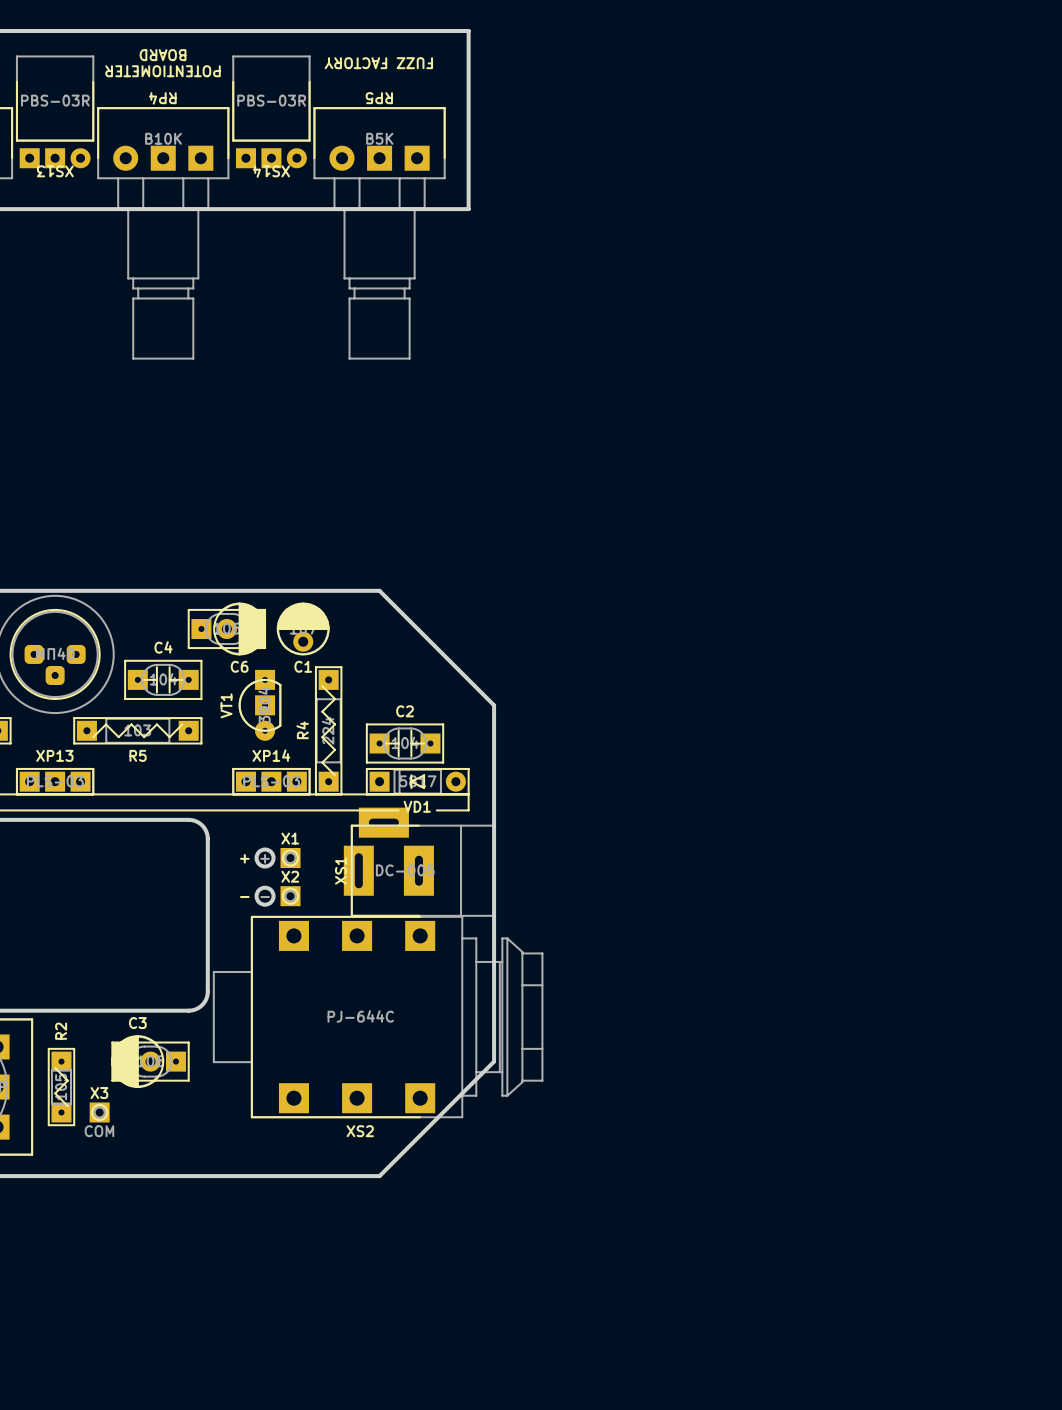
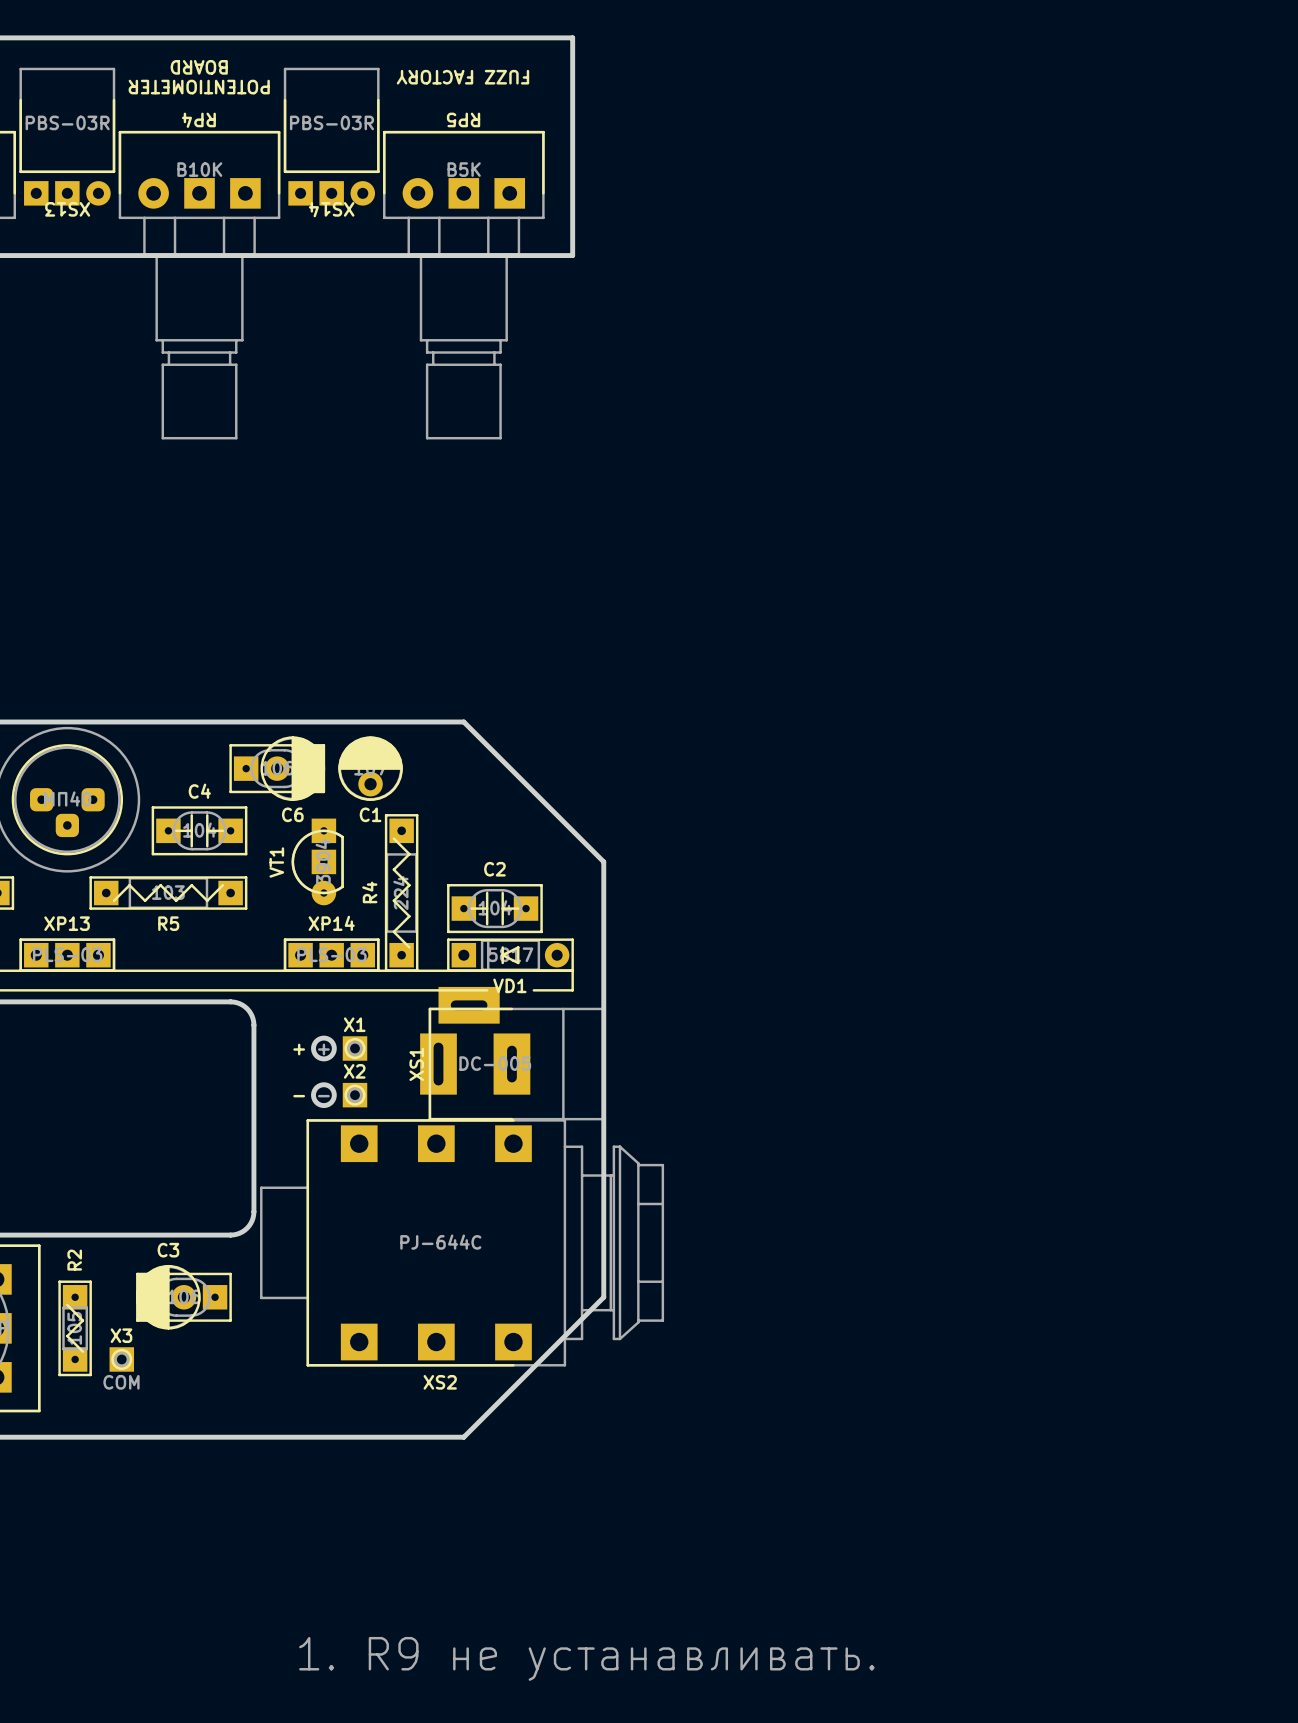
text: none -> 1. R9 не устанавливать. (586, 1658)

